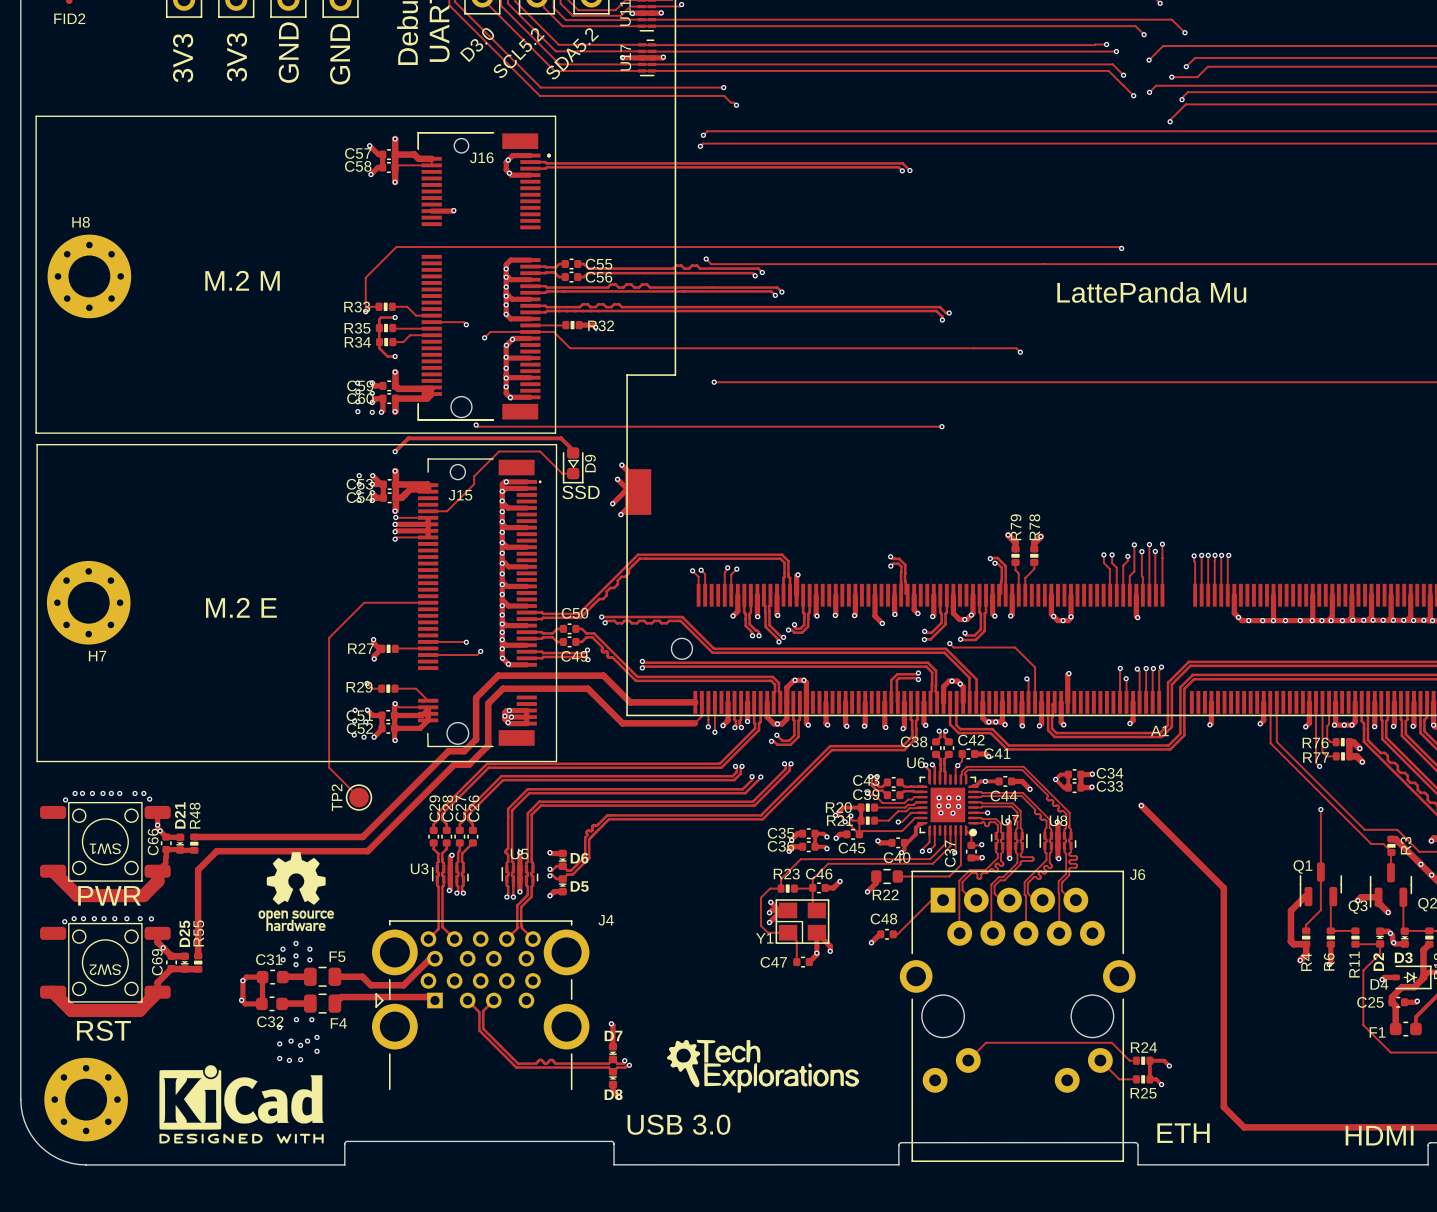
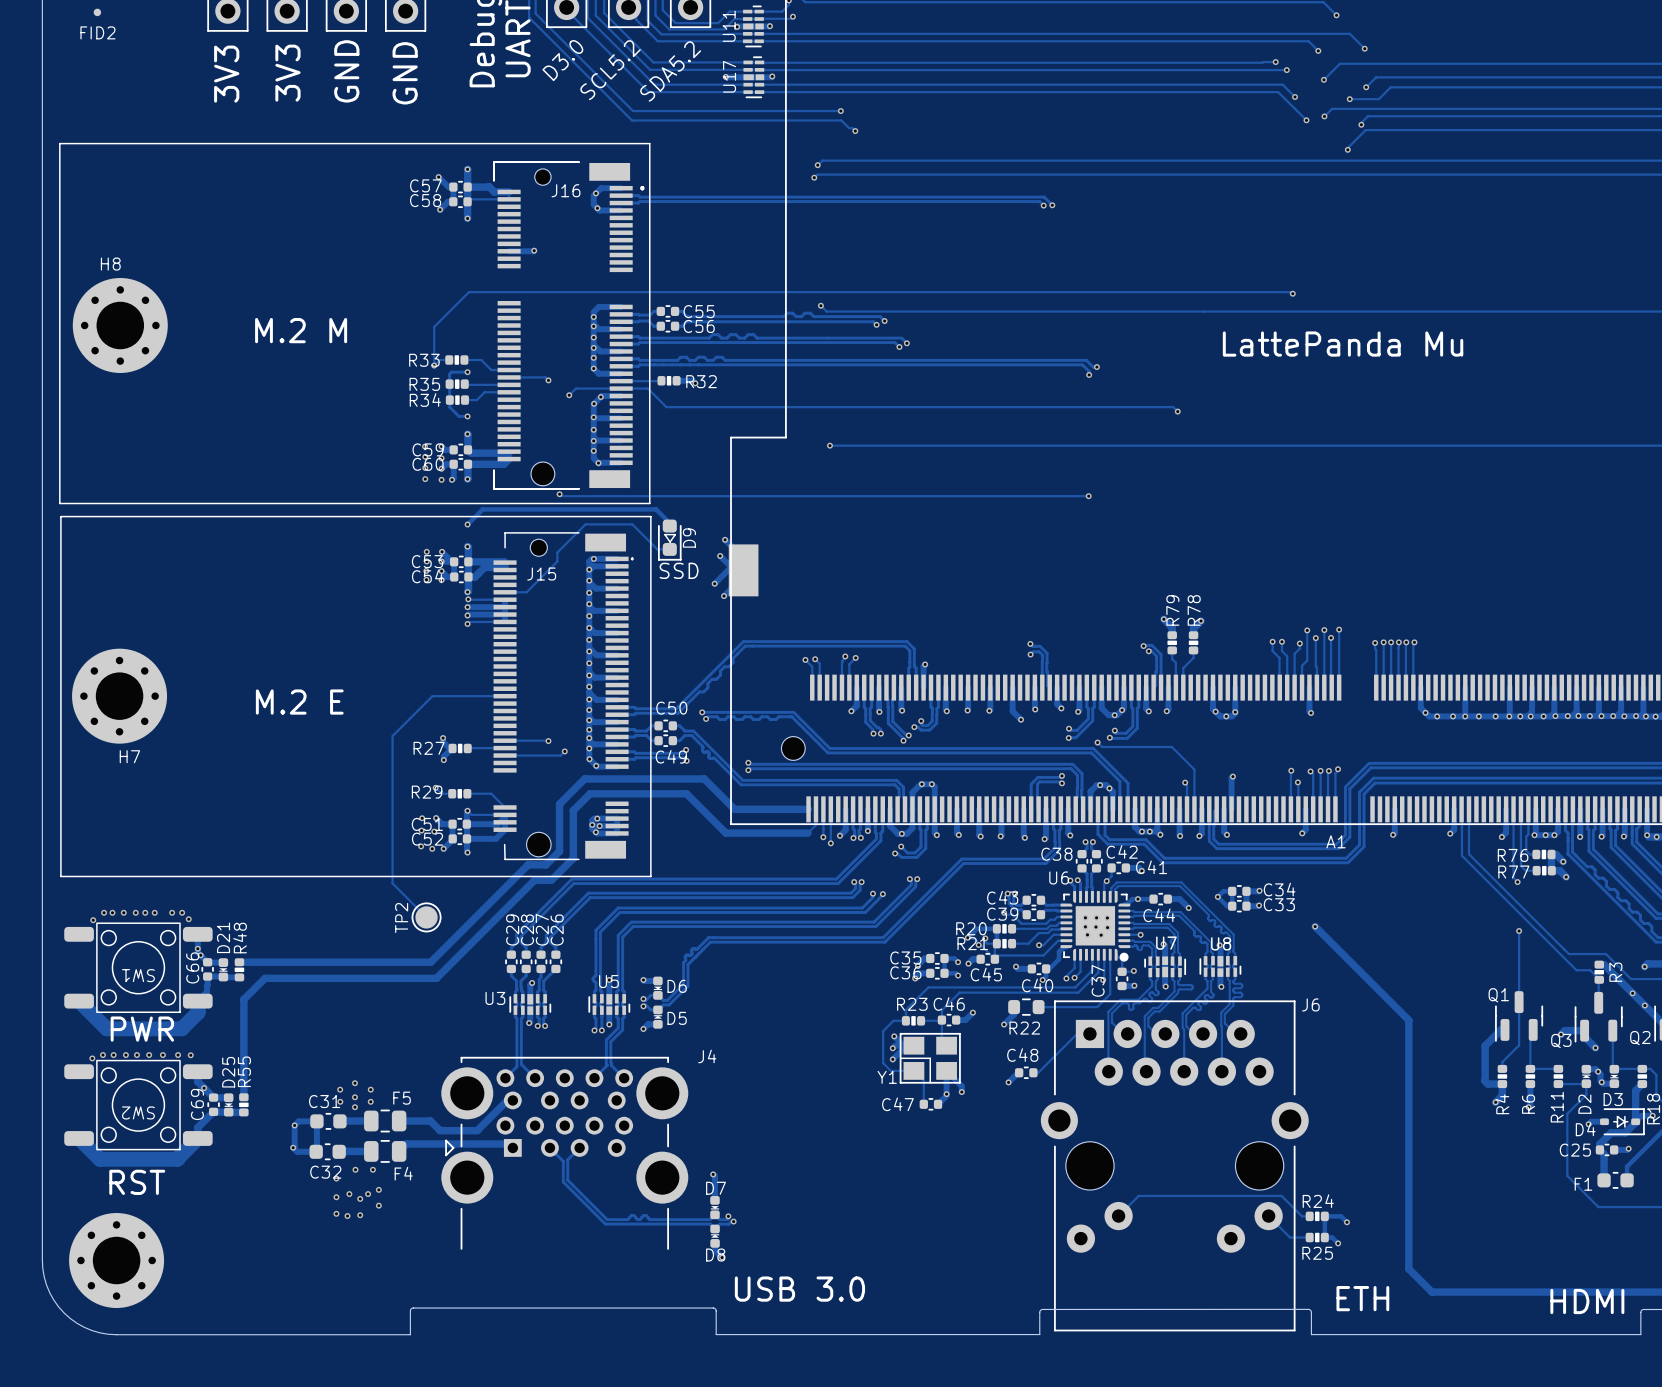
drawing: [258, 852, 334, 932] -> none
drawing: [666, 1039, 860, 1093] -> none
drawing: [159, 1065, 324, 1144] -> none

